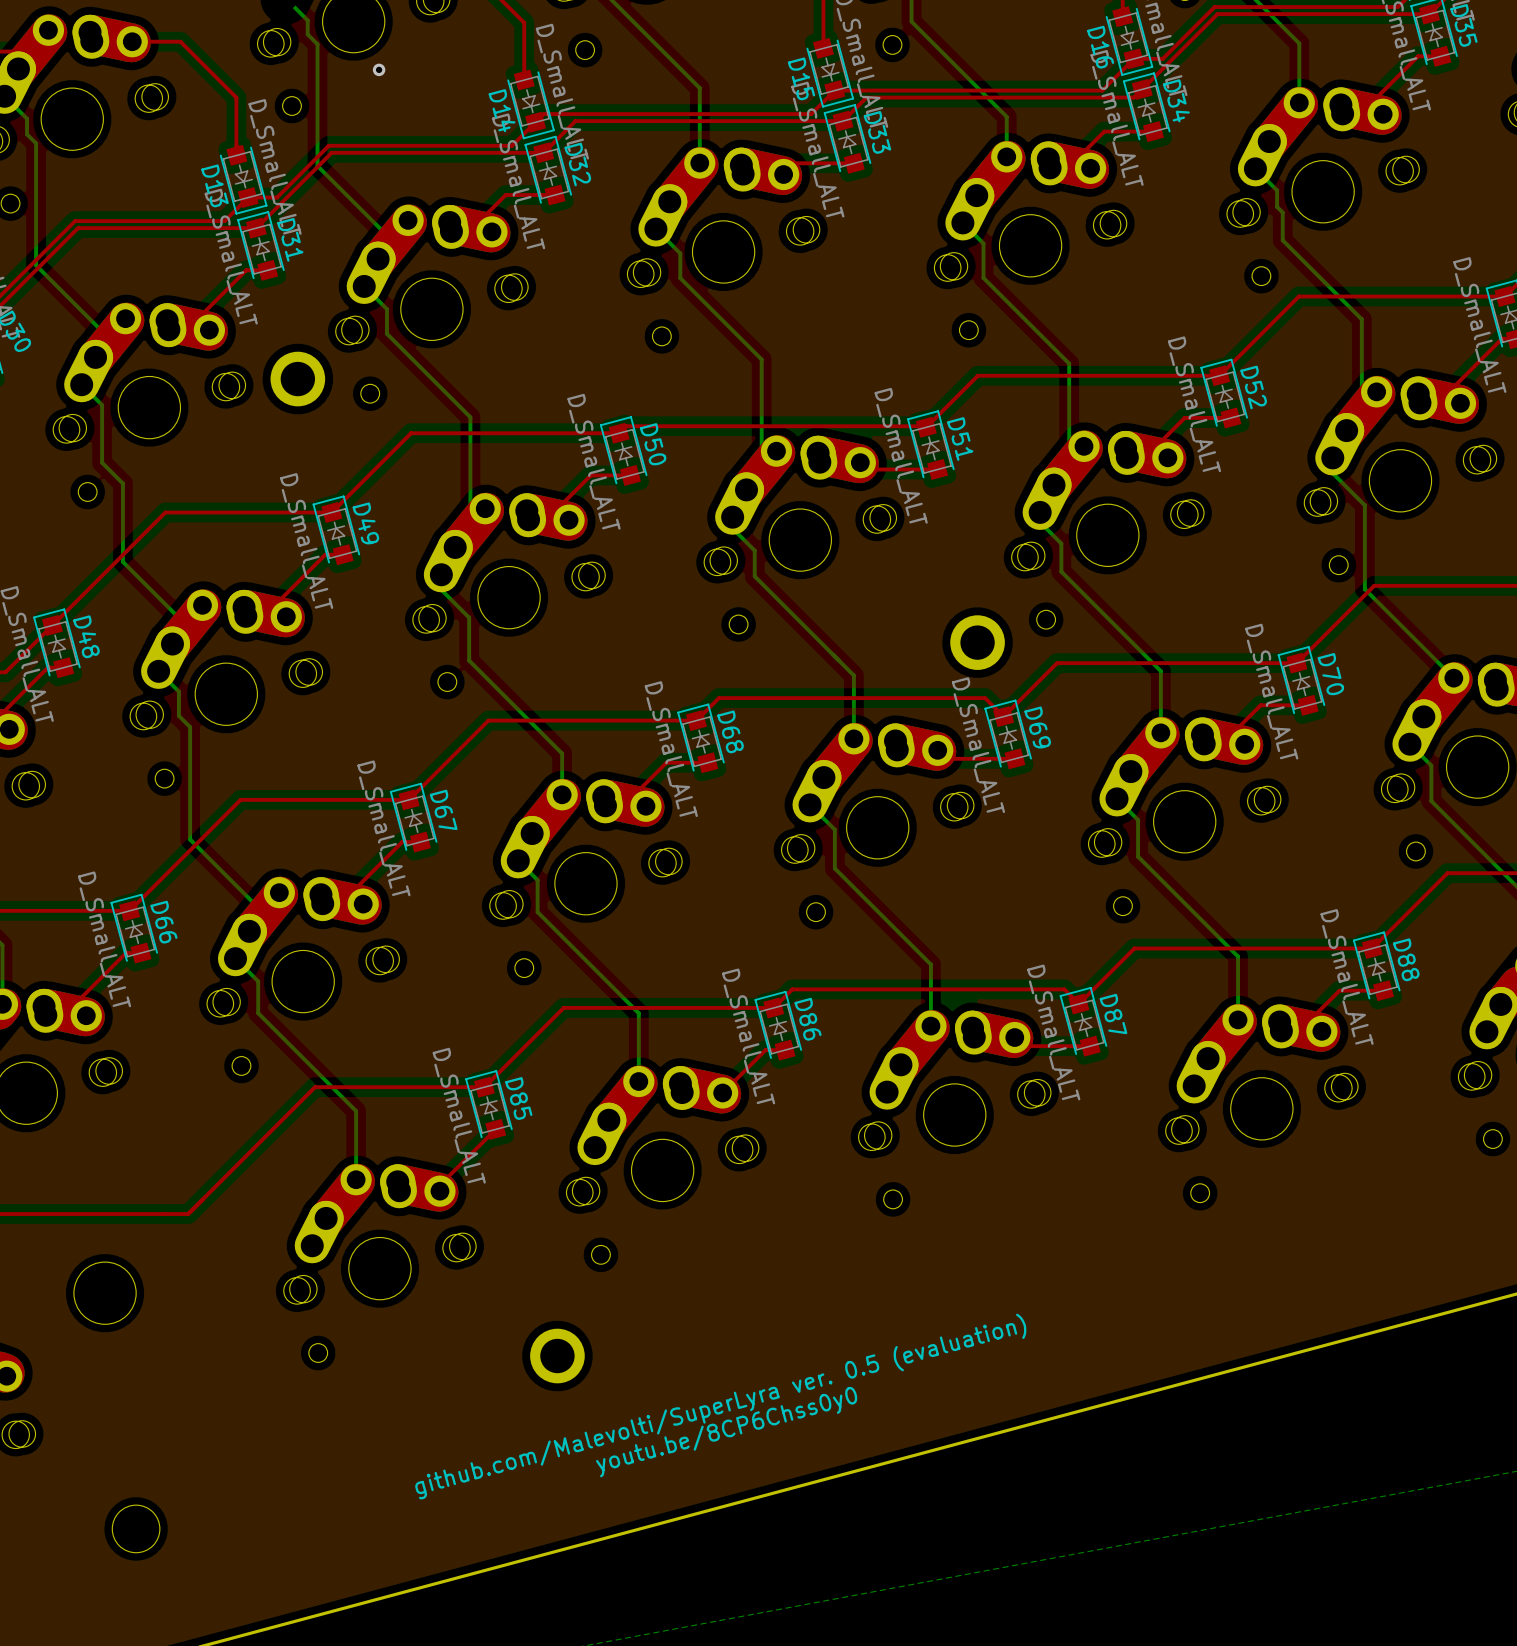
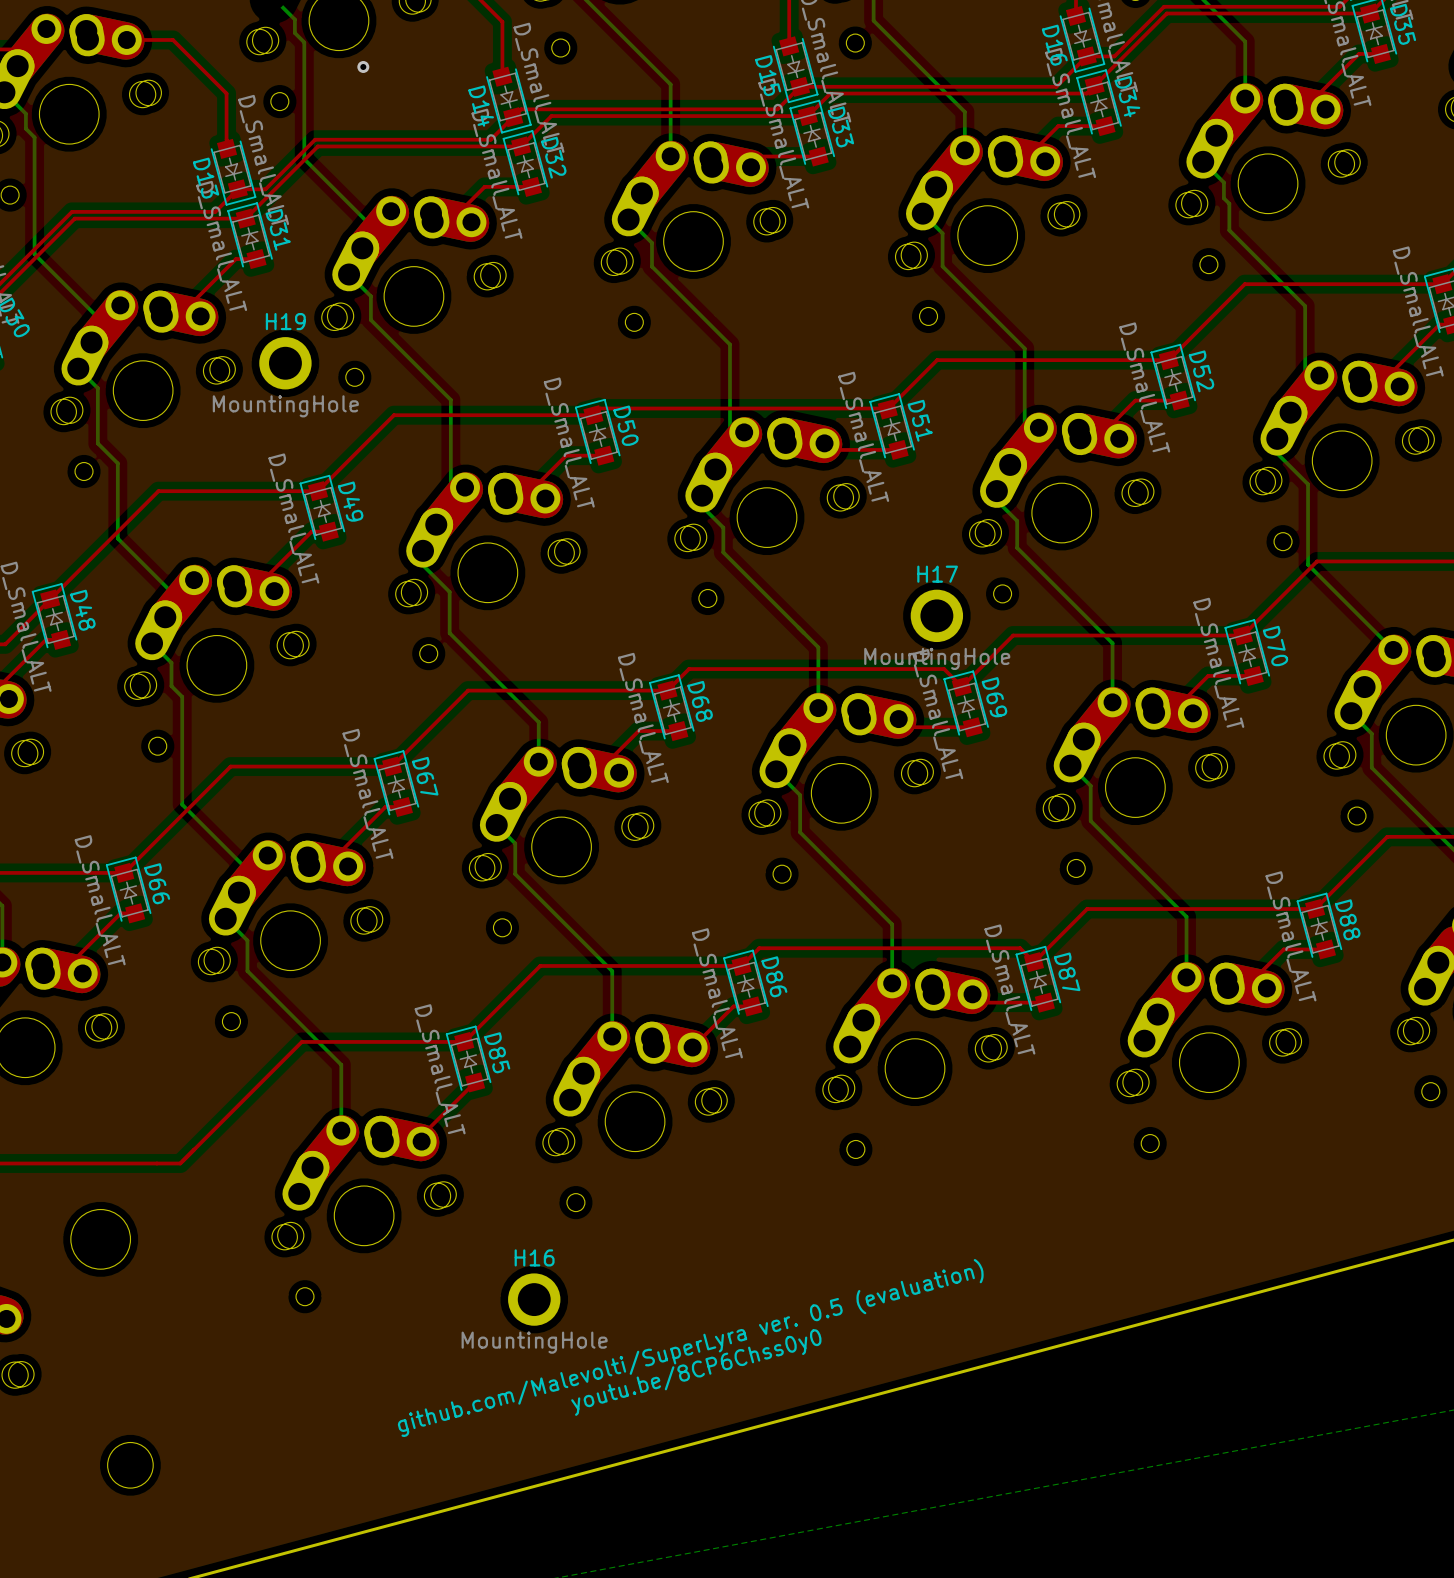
H19 name: none -> H19 (285, 321)
H19 value: none -> MountingHole (285, 406)
H17 name: none -> H17 (937, 574)
H17 value: none -> MountingHole (937, 658)
H16 name: none -> H16 (534, 1257)
H16 value: none -> MountingHole (534, 1342)

